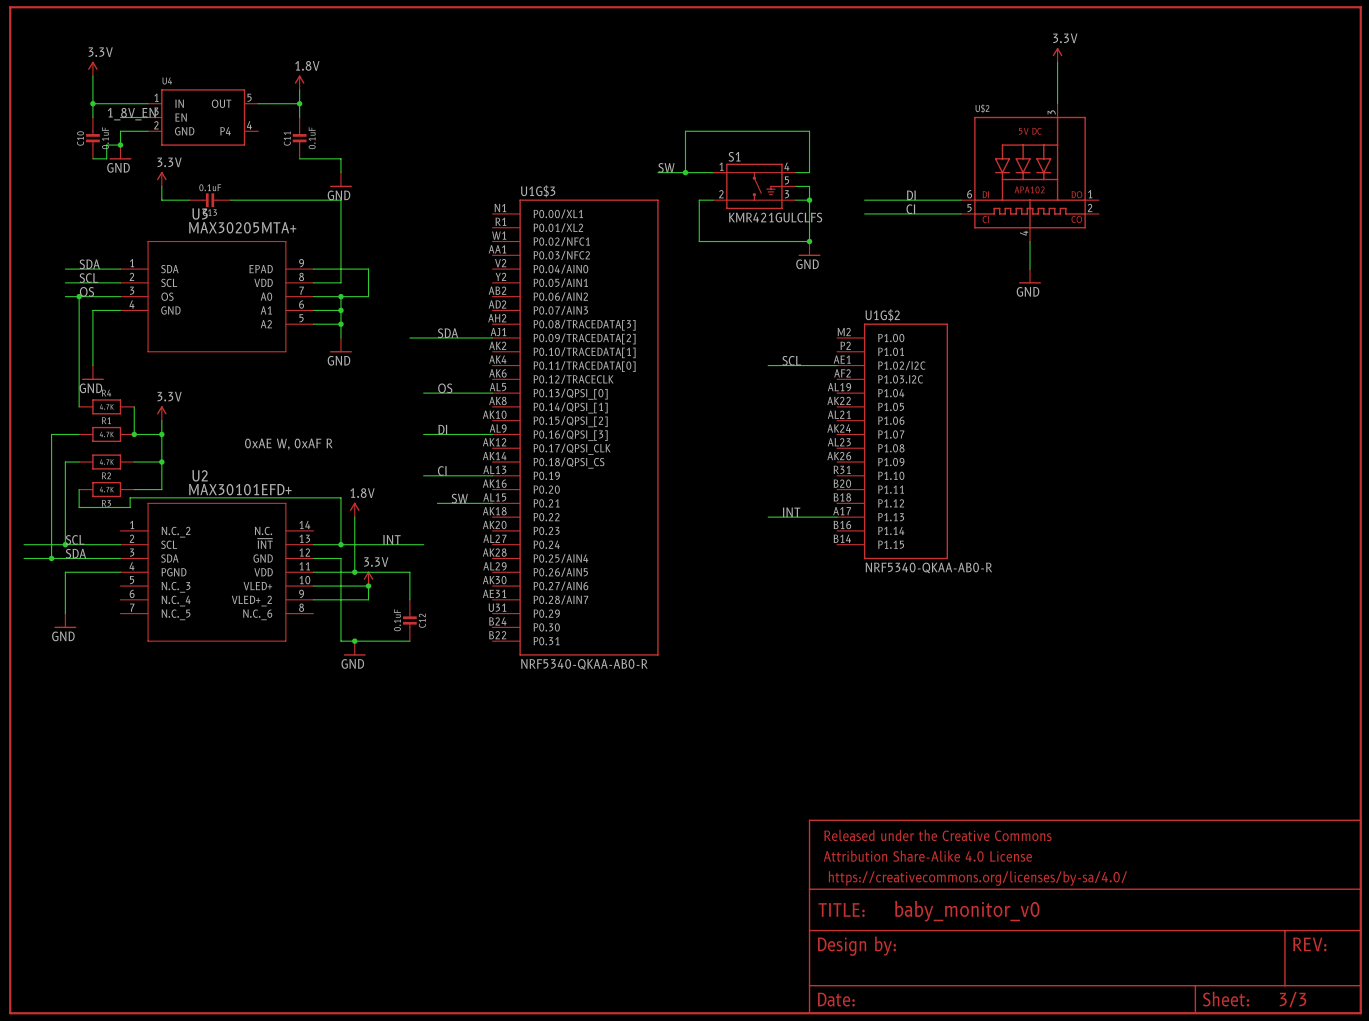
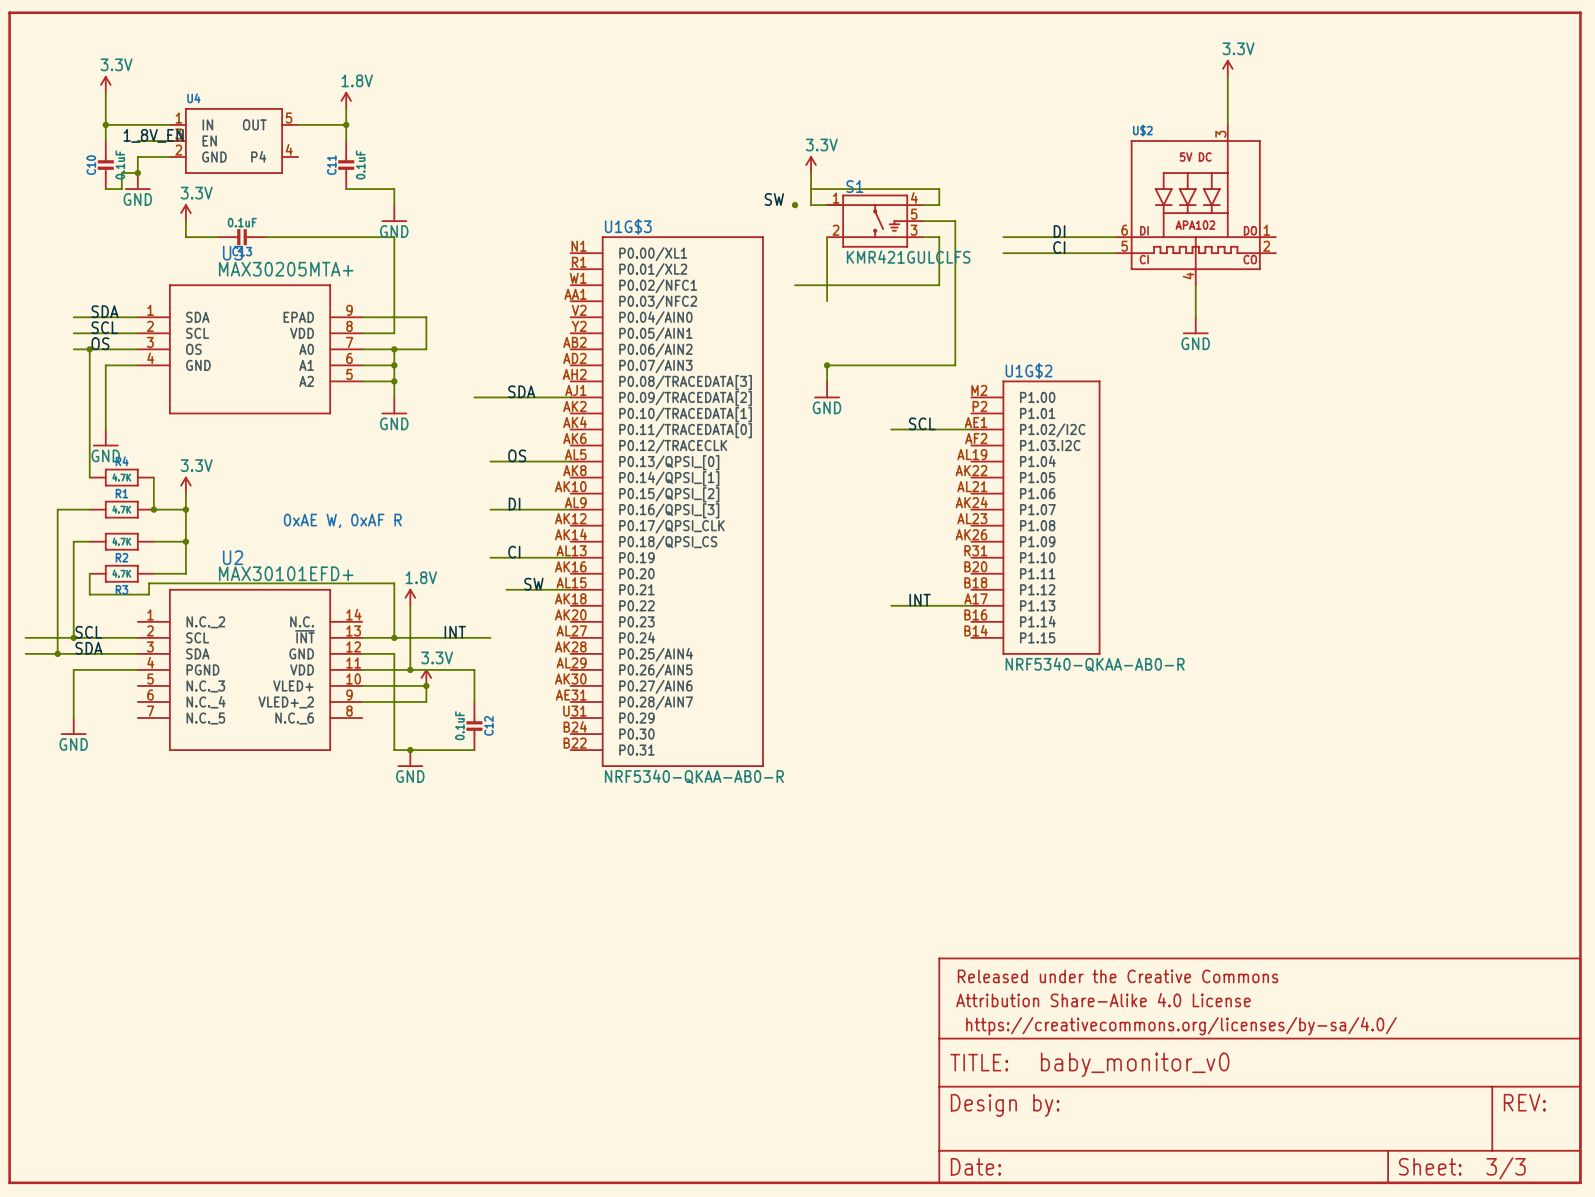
power symbol: none -> 3.3V (811, 164)
wire: (809, 158) (809, 131) (685, 131) (685, 172) -> (939, 189) (811, 189)
wire: (657, 172) (699, 172) -> (811, 173) (811, 205)
wire: (809, 186) (809, 200) -> (939, 221) (955, 221) (955, 365) (827, 365) (827, 381)
wire: (713, 200) (699, 200) (699, 241) -> (827, 237) (827, 301)
junction: (809, 200) -> none
wire: none -> (795, 285) (811, 285)
junction: (809, 241) -> none
power symbol position: GND (809, 248) -> GND (827, 389)
junction: none -> (827, 365)

